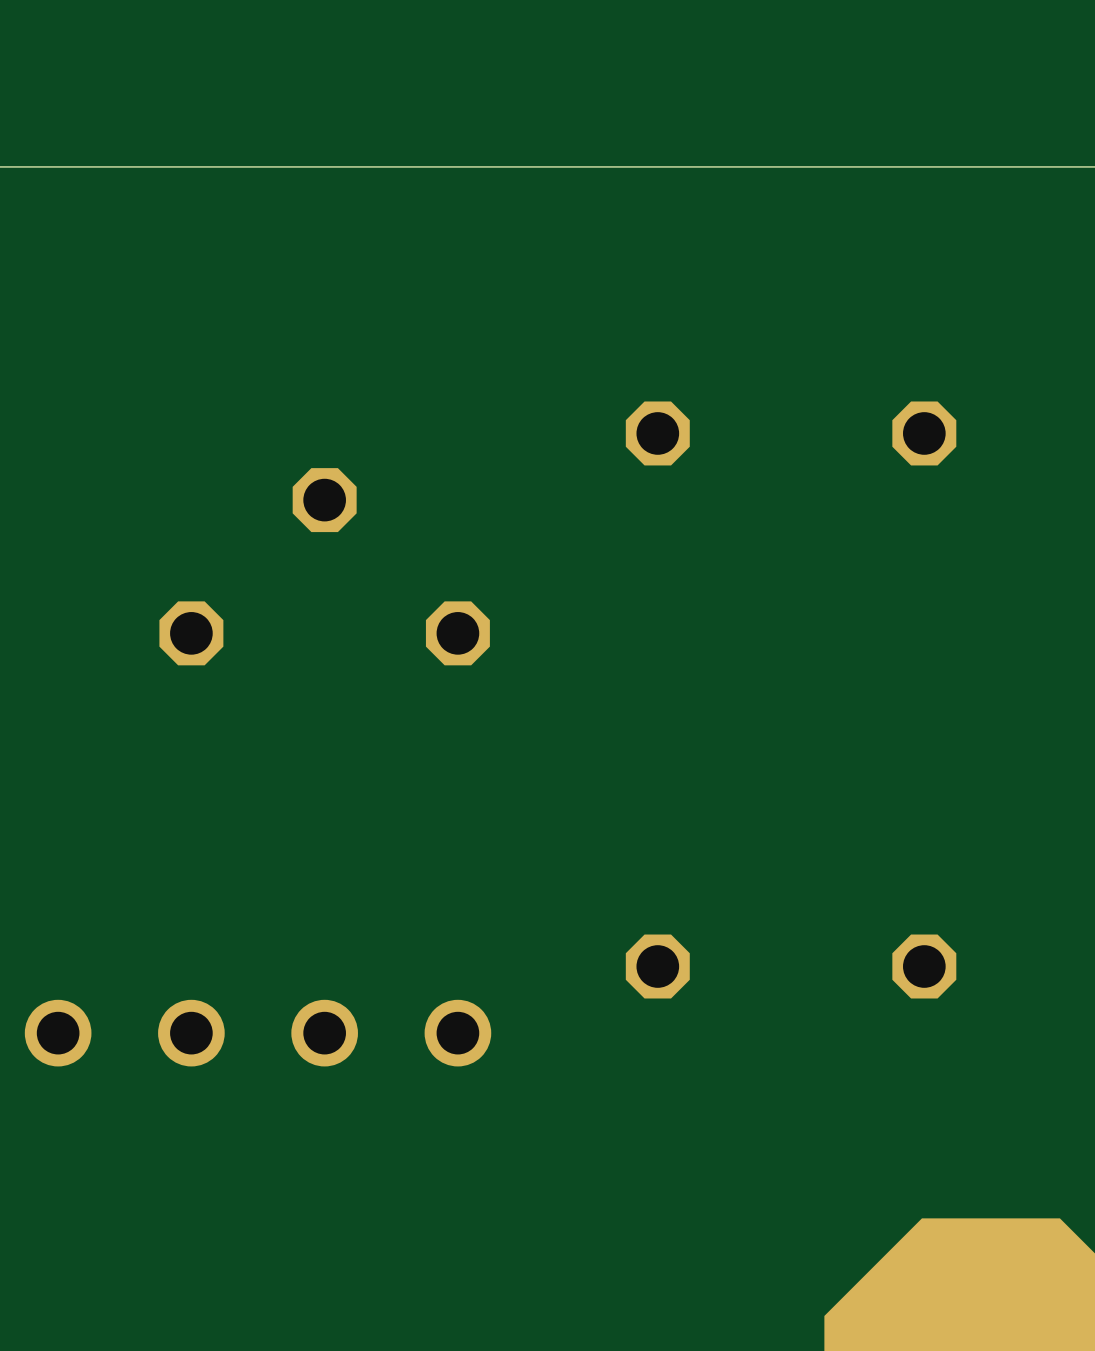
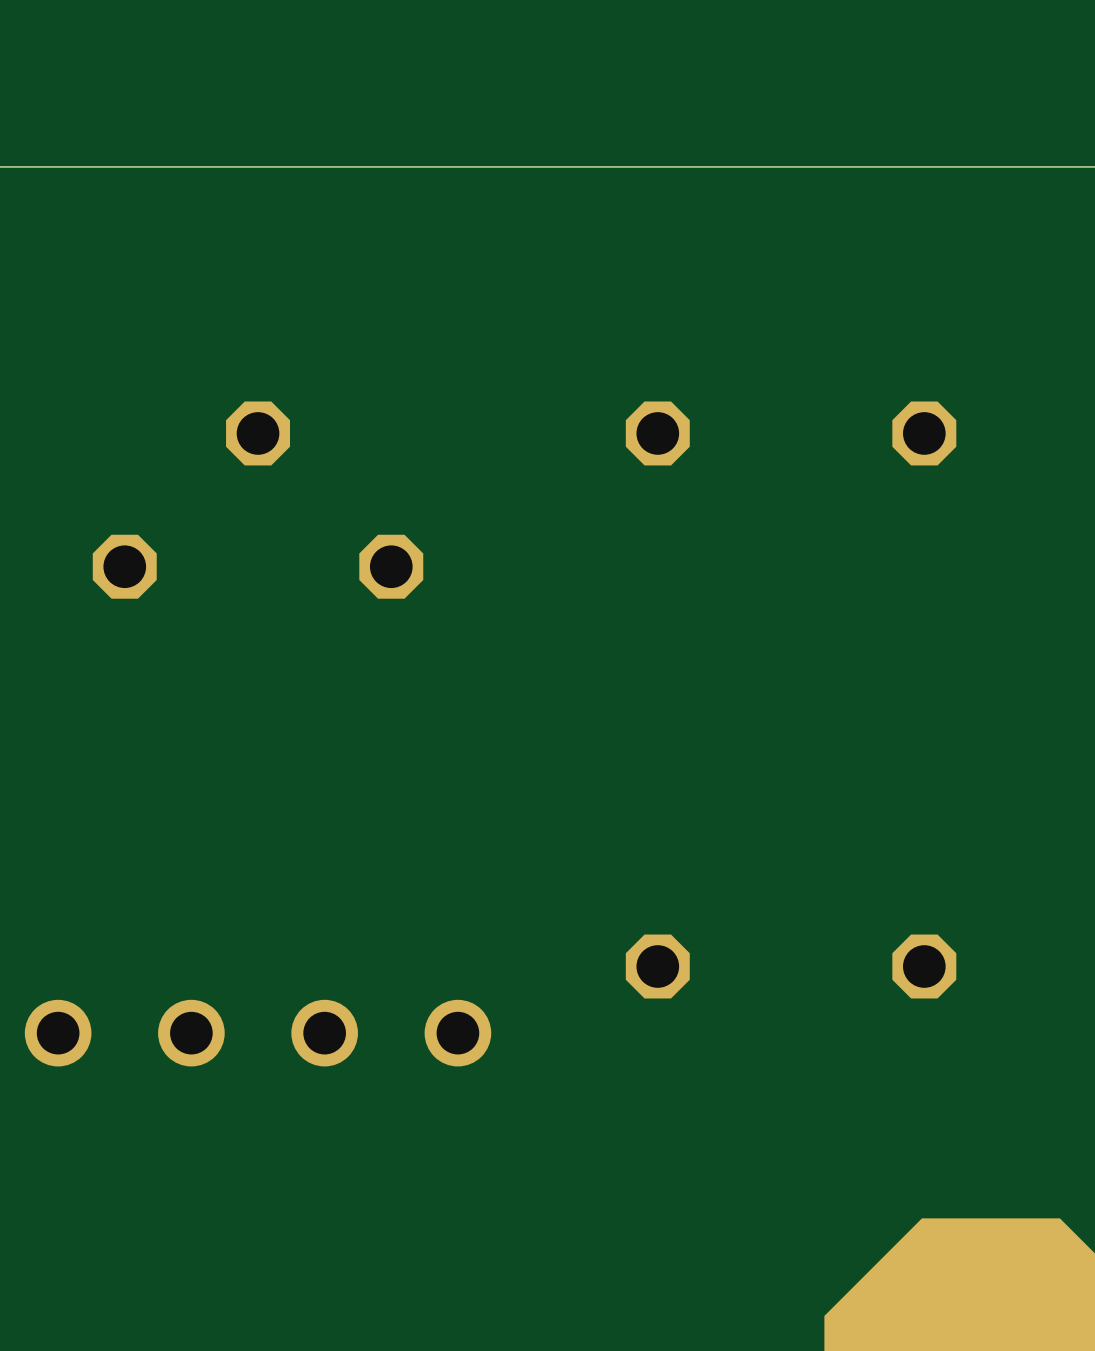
part position: (324, 566) -> (258, 500)

